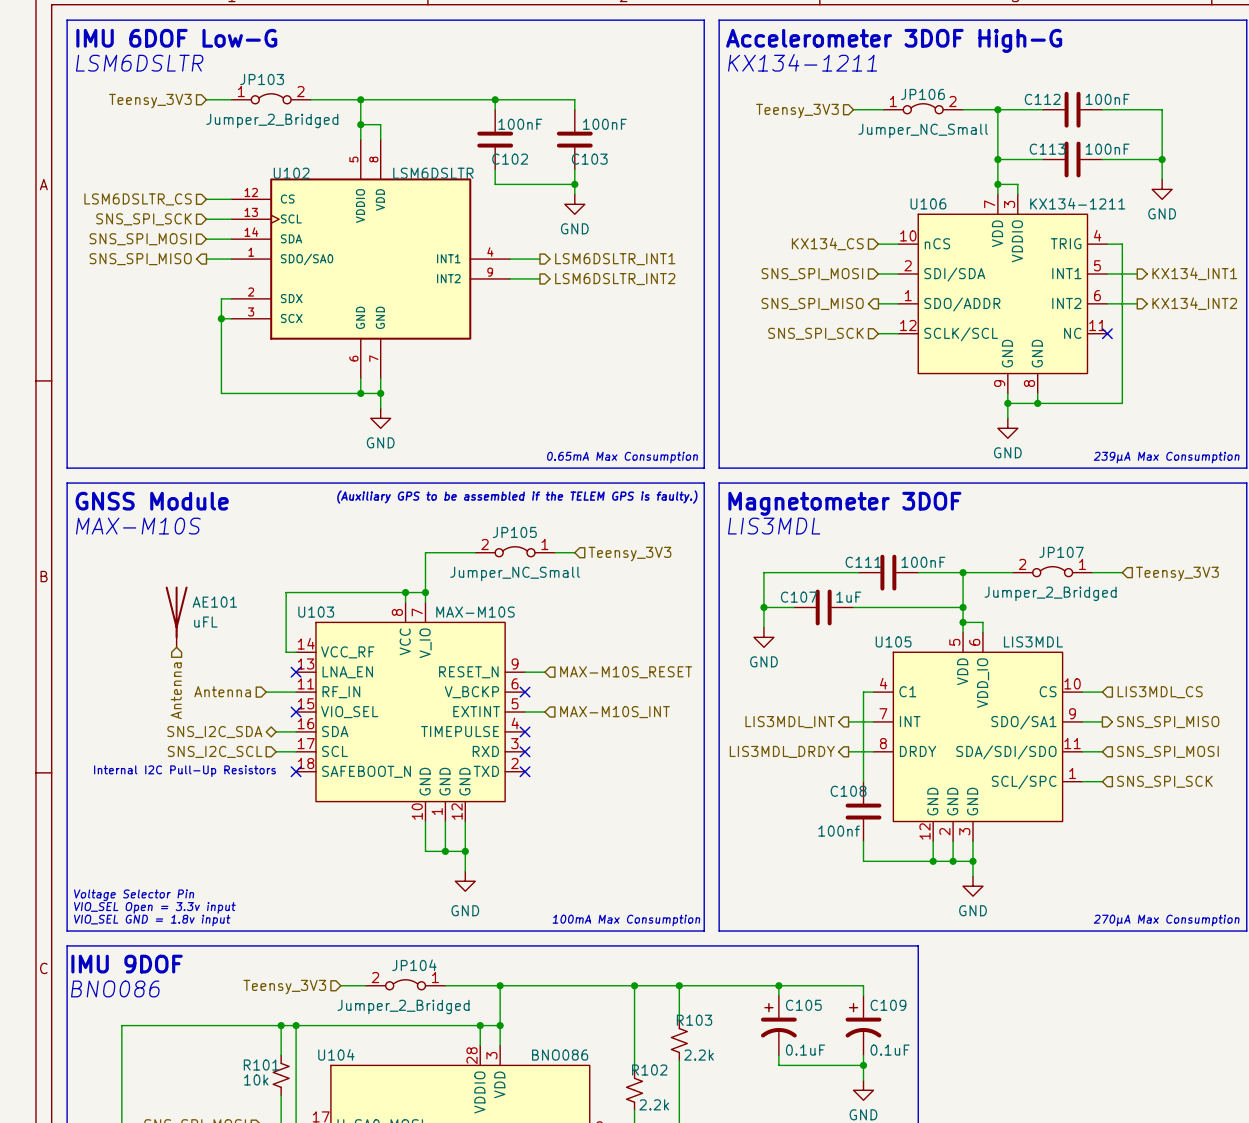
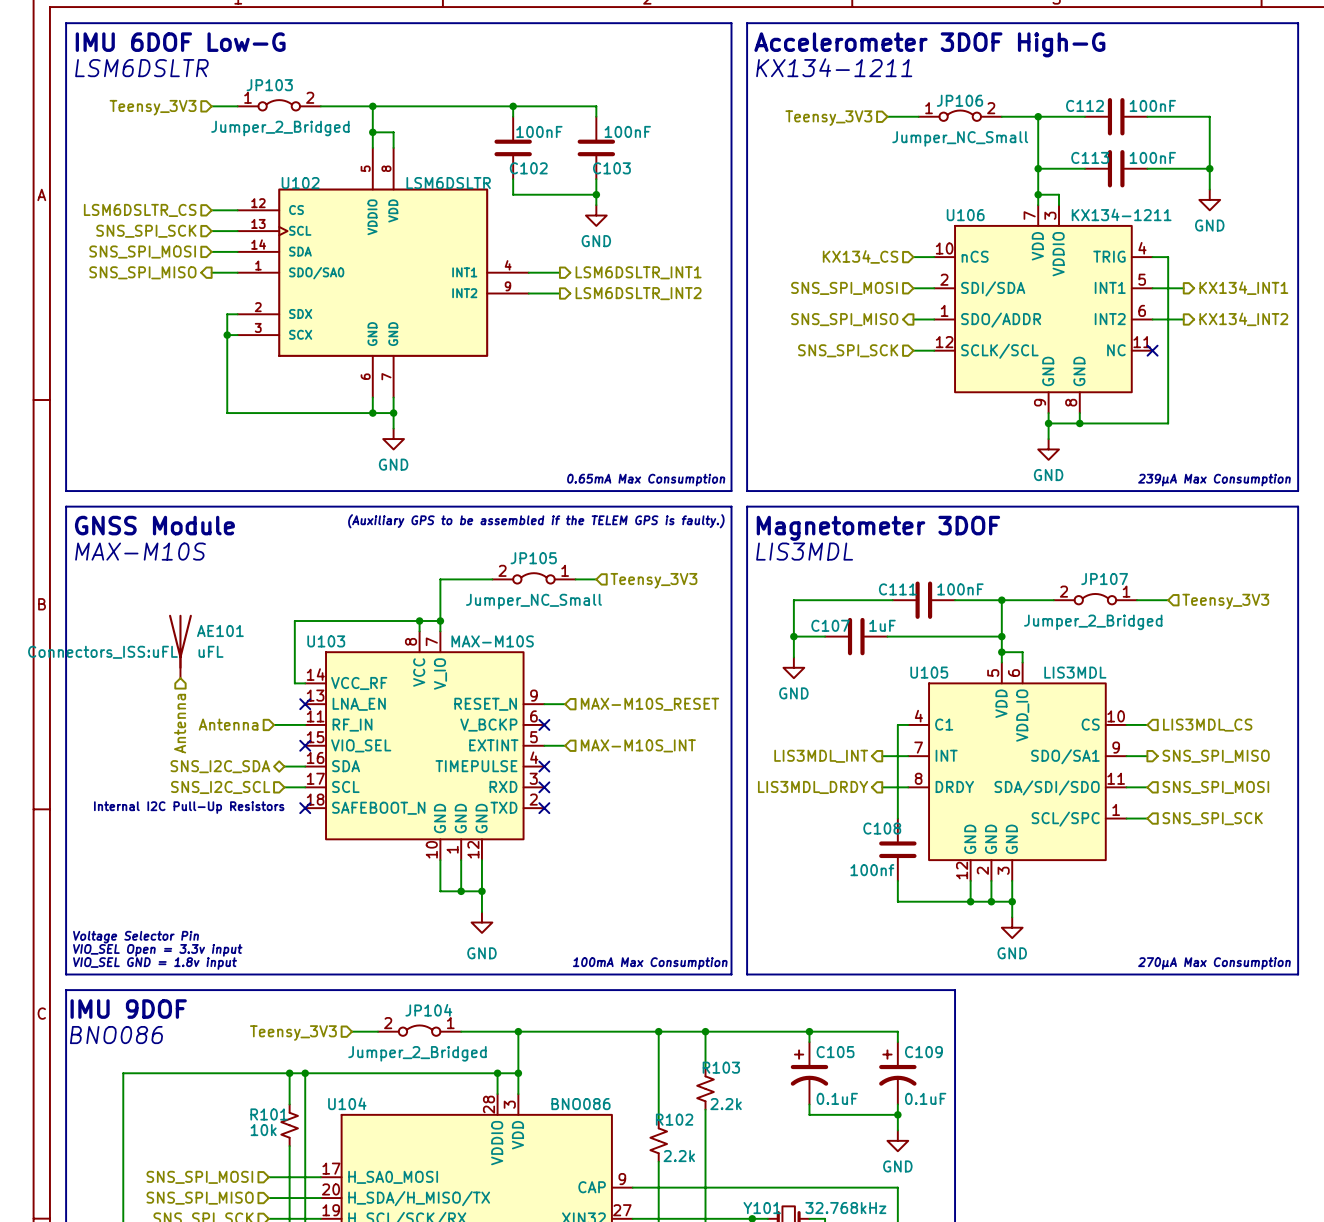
AE101 text: none -> Connectors_ISS:uFL (102, 652)

